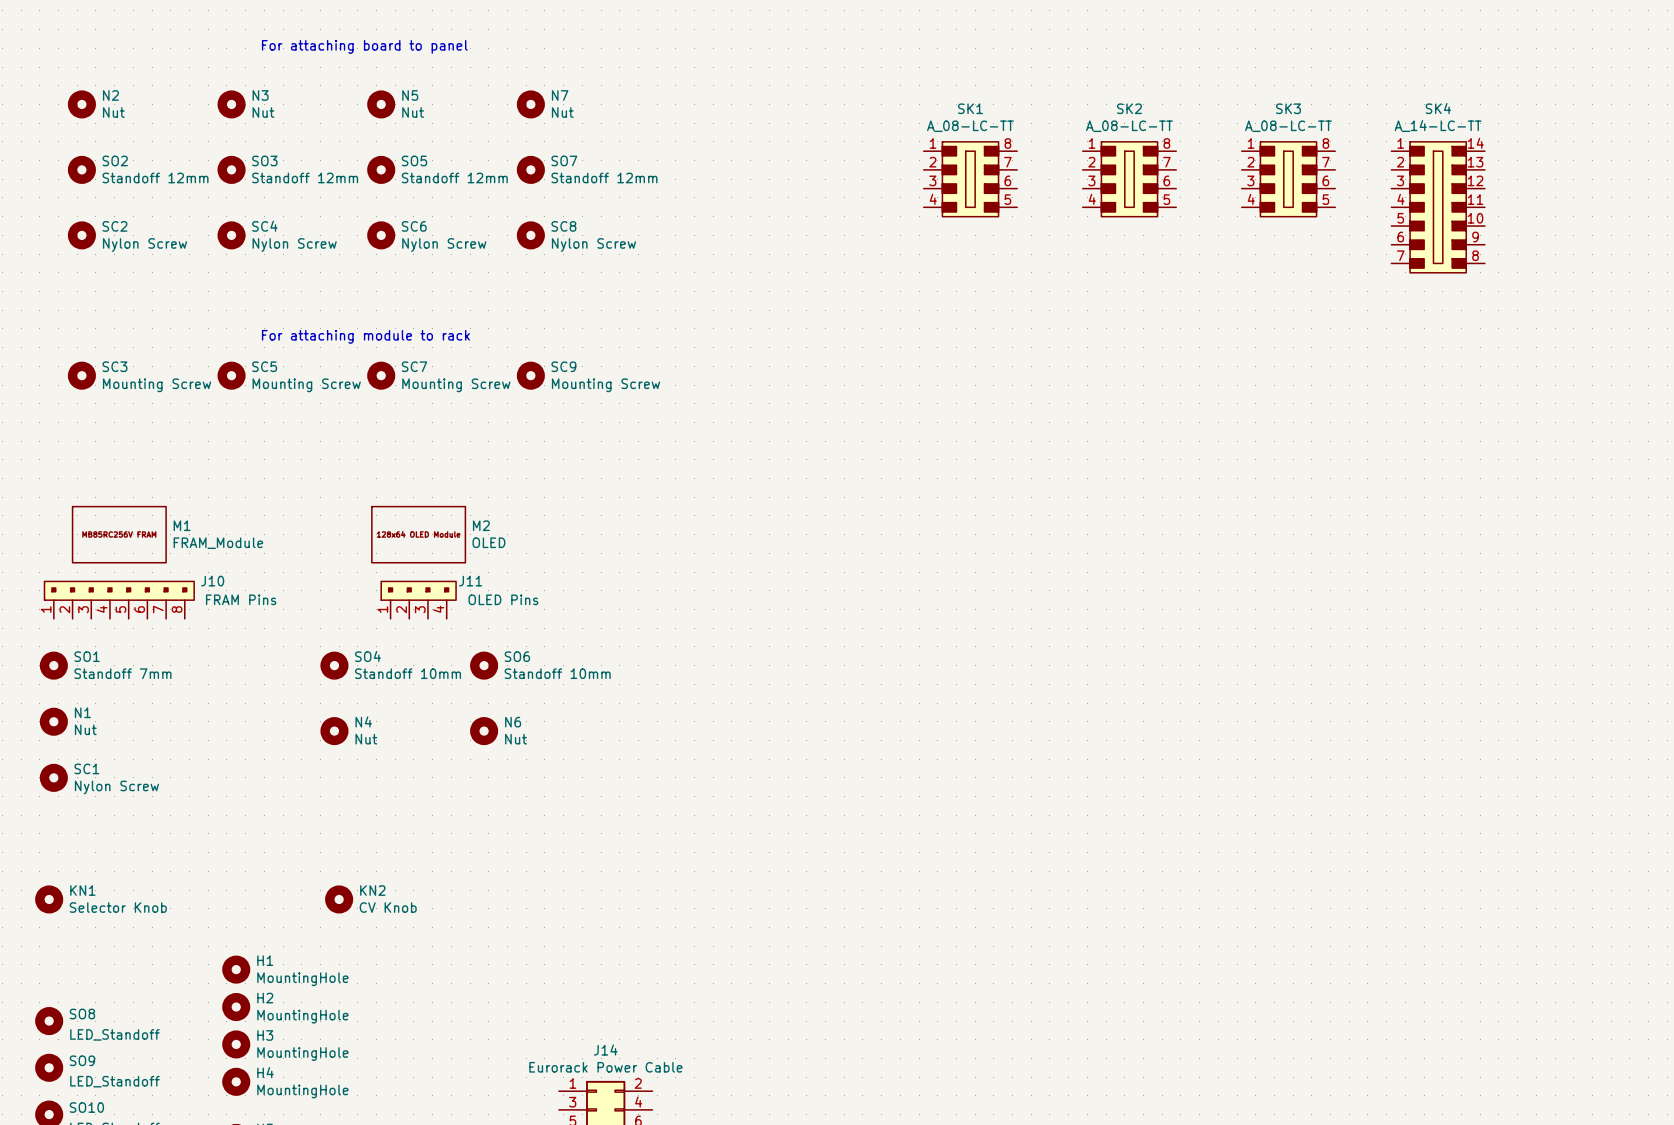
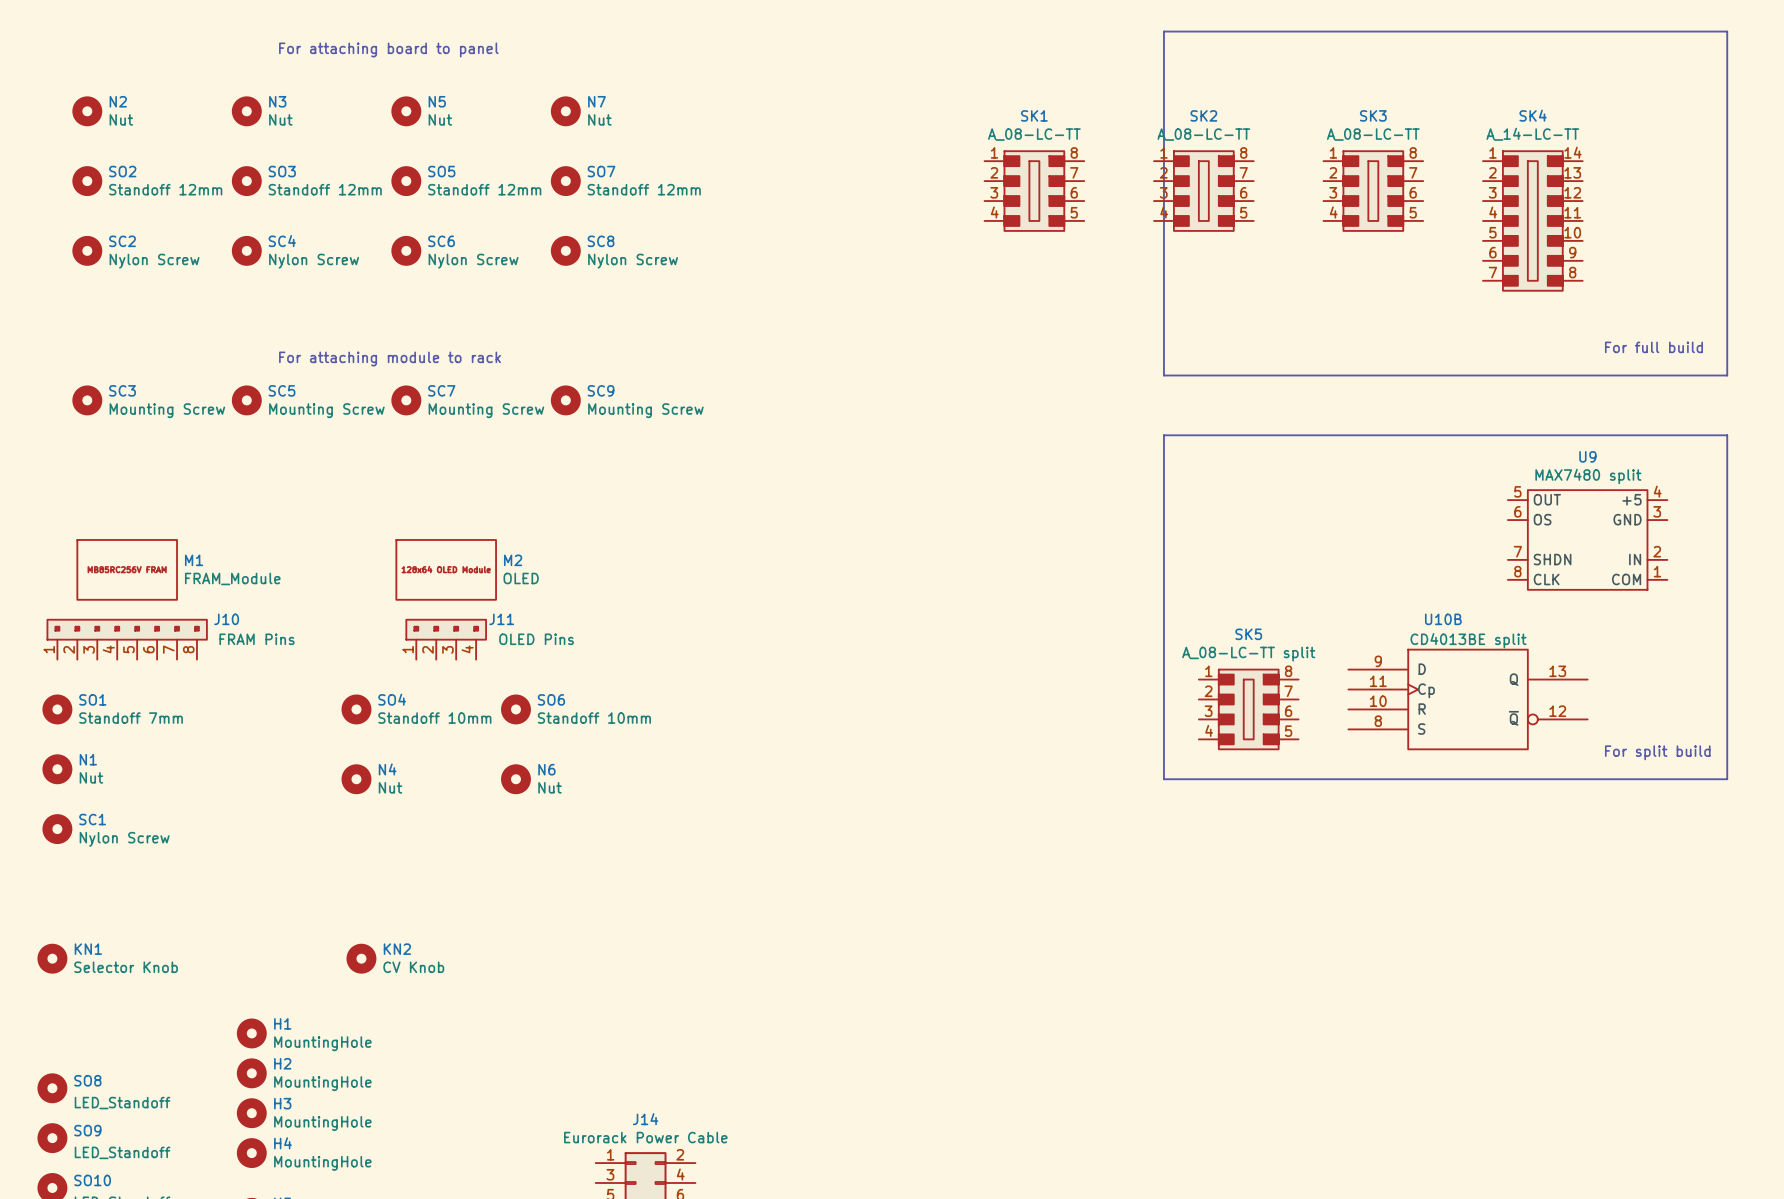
line: none -> (1163, 31) (1727, 31) (1727, 375) (1163, 375) (1163, 31)
text: none -> For full build (1653, 347)
line: none -> (1163, 435) (1727, 435) (1727, 779) (1163, 779) (1163, 435)
U9: none -> MAX7480 split (1587, 539)
U10B: none -> CD4013BE split (1468, 699)
SK5: none -> A_08-LC-TT split (1248, 709)
text: none -> For split build (1657, 752)

